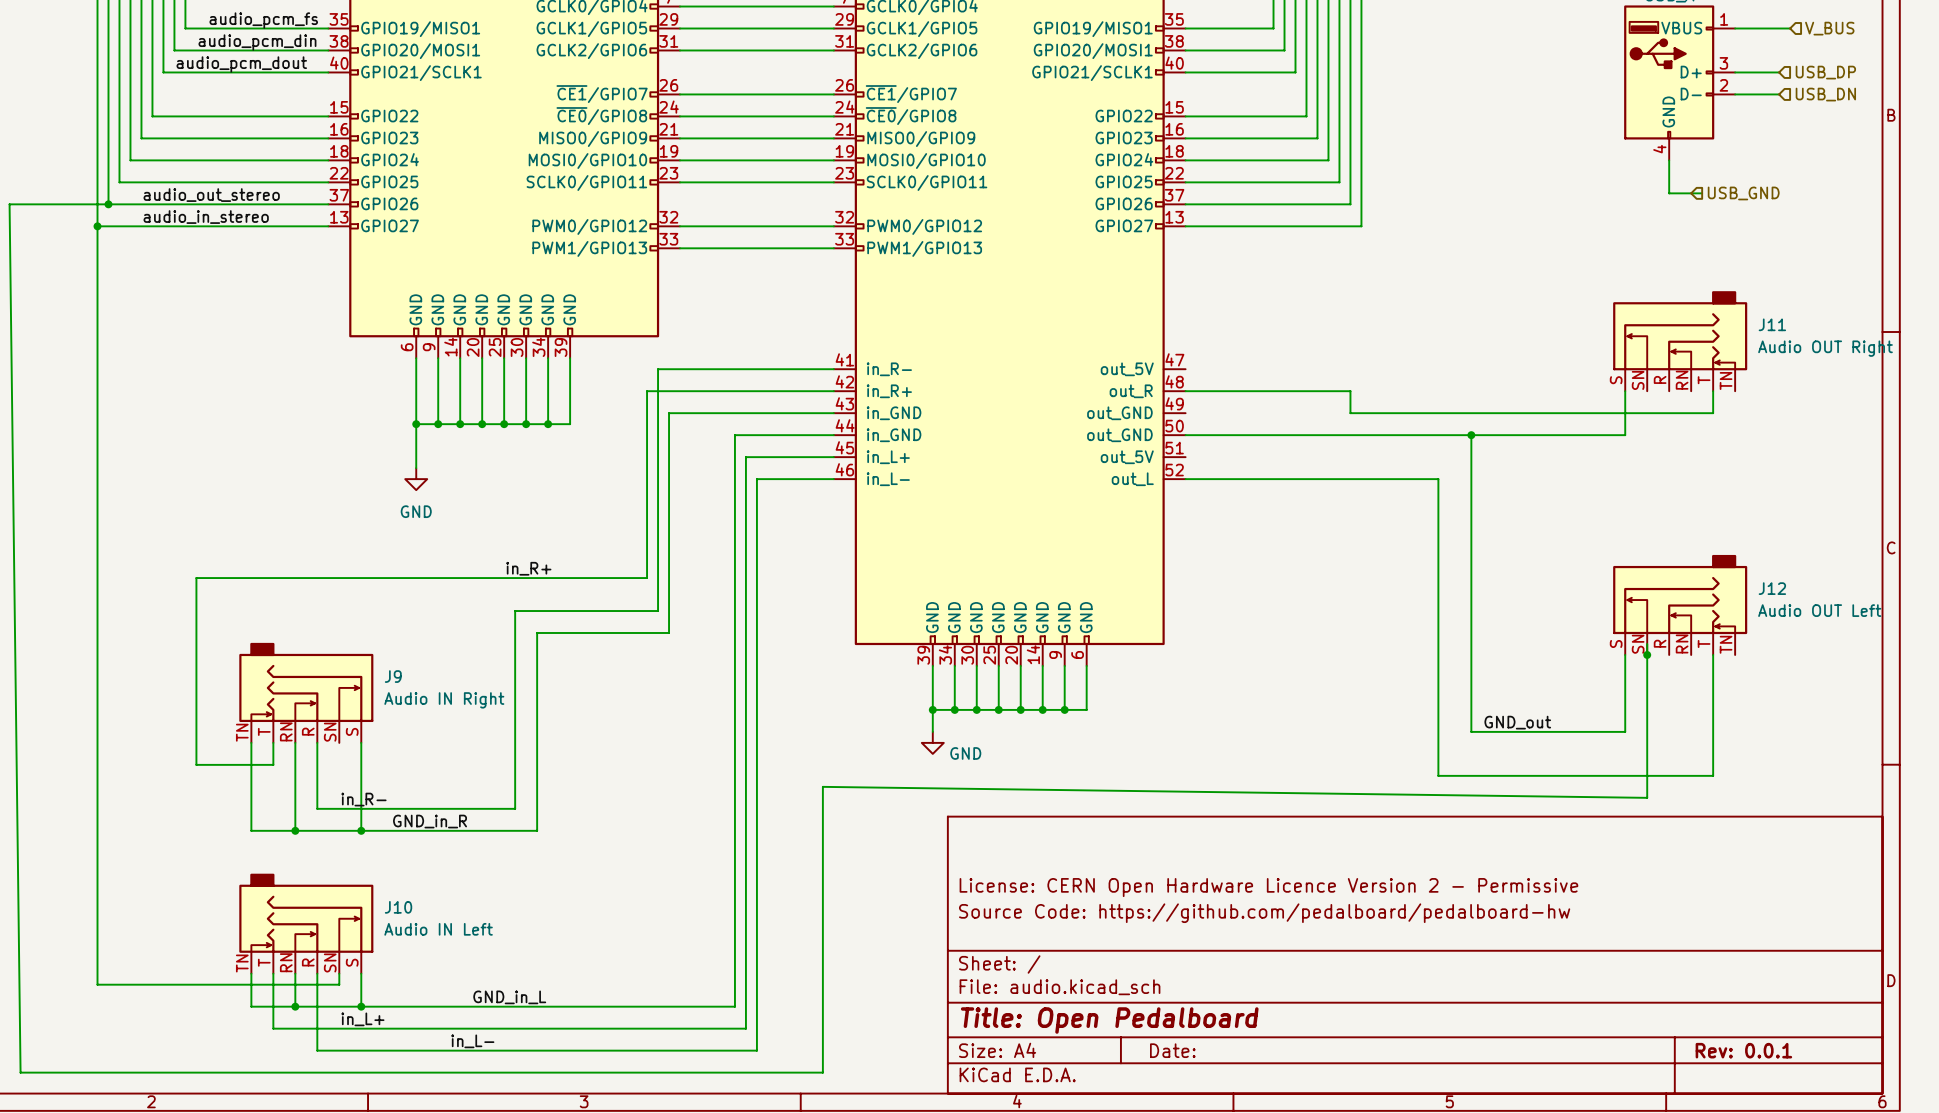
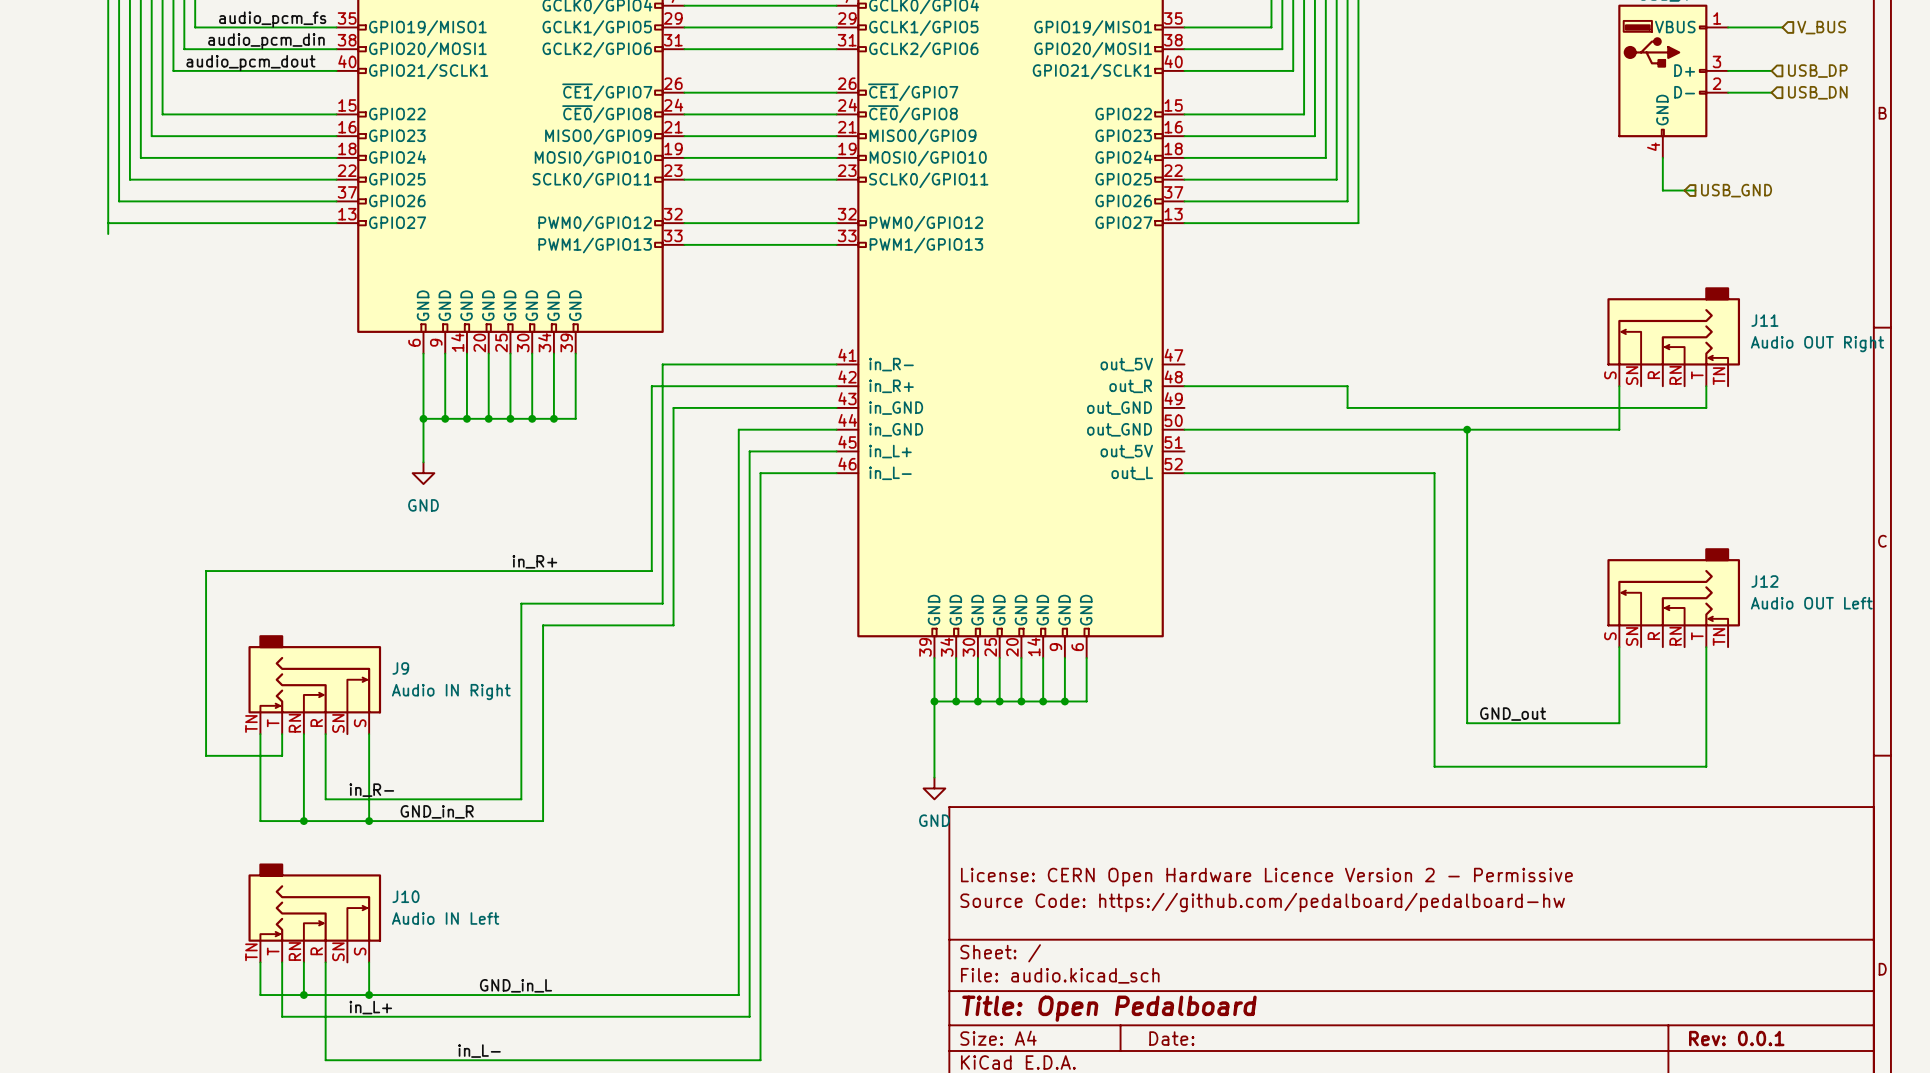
label: audio_out_stereo (211, 195) -> none
wire: (108, 204) (9, 204) (20, 1072) (317, 1072) -> none
junction: (108, 204) -> none
label: audio_in_stereo (206, 217) -> none
junction: (97, 226) -> none
wire: (97, 237) (97, 984) (339, 984) (339, 973) -> none
wire: (1647, 643) (1647, 797) (822, 786) (822, 1072) (756, 1072) -> (760, 1038) (760, 1060)
junction: (1647, 654) -> none
wire: none -> (934, 723) (934, 777)
power symbol position: GND (932, 742) -> GND (934, 788)
power symbol text position: GND (965, 753) -> GND (934, 820)
label position: in_L- (472, 1041) -> in_L- (479, 1051)
wire: (317, 1050) (756, 1050) -> (325, 1038) (325, 1060)

